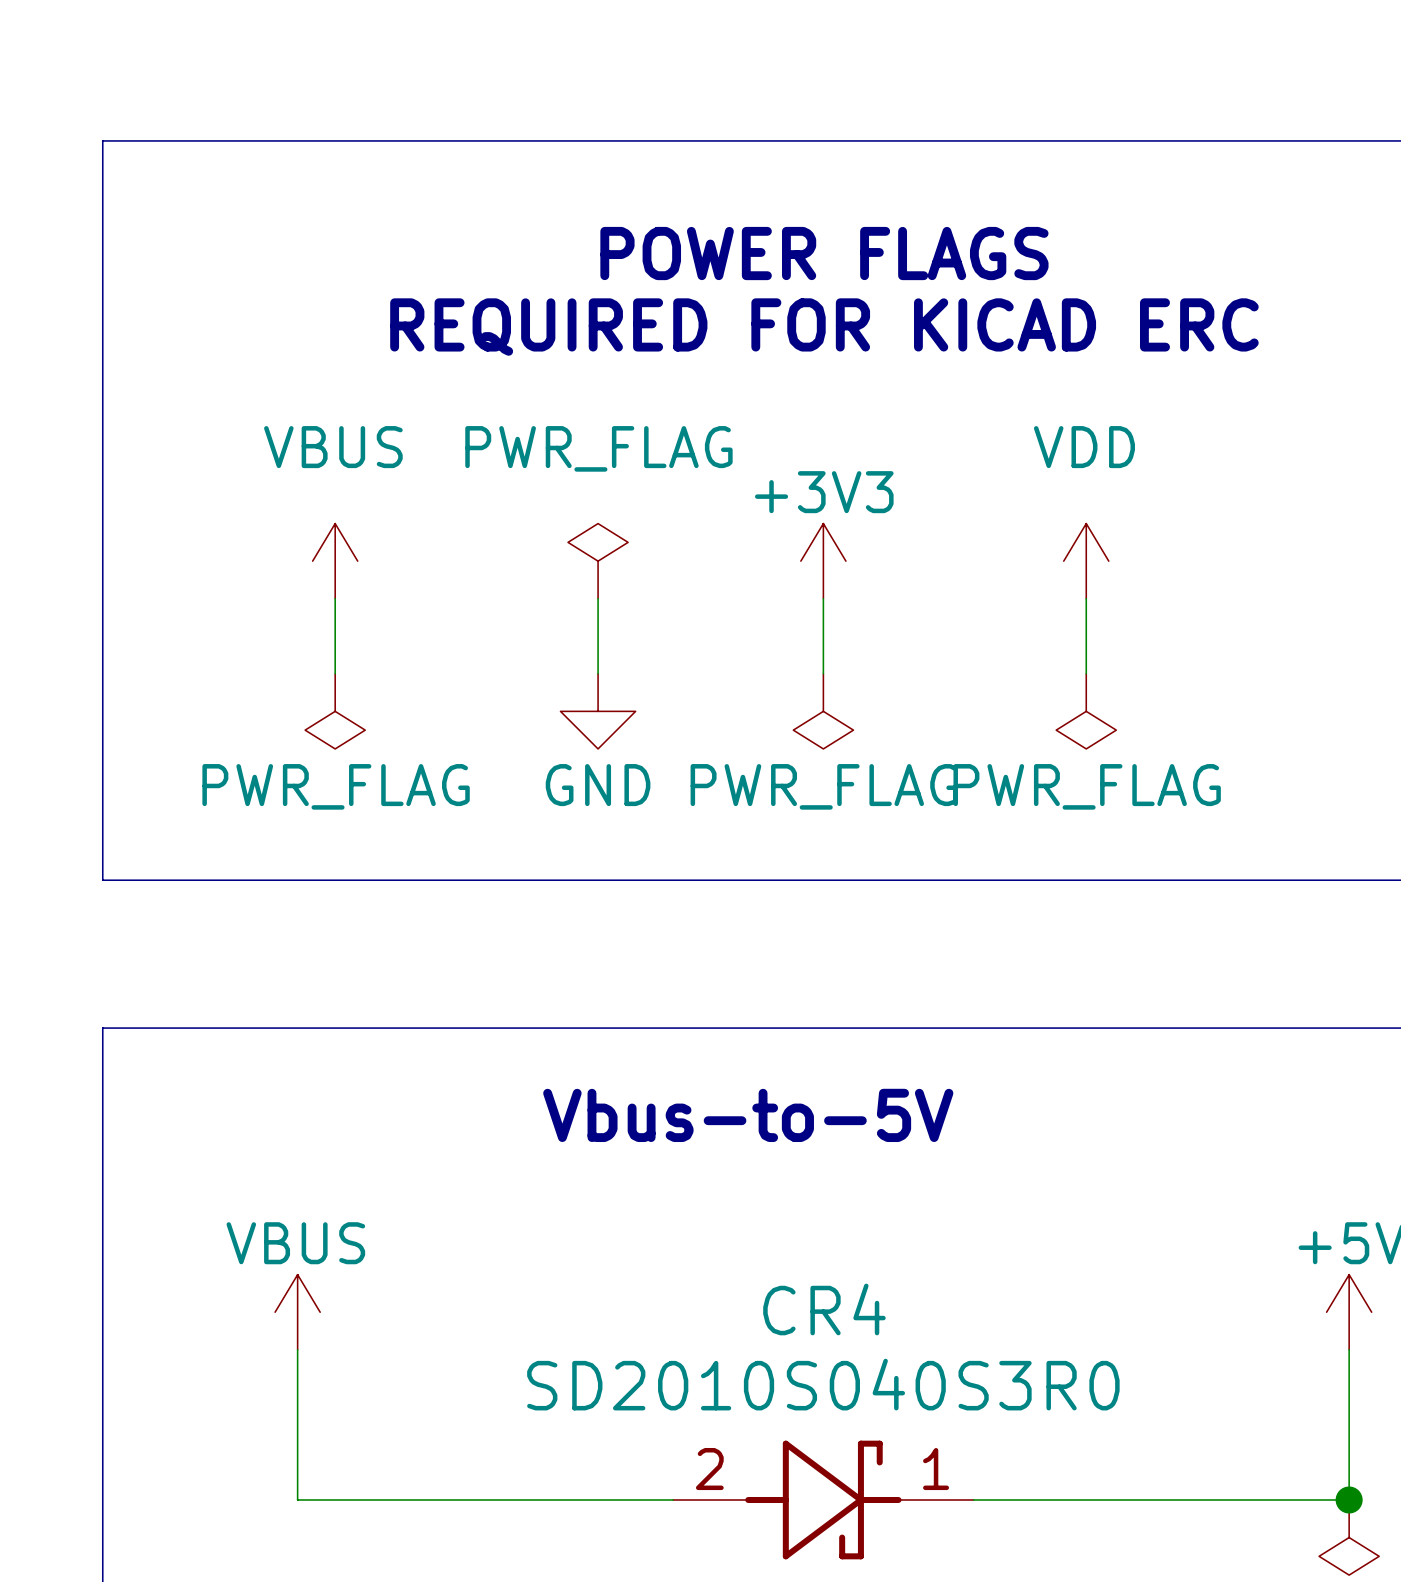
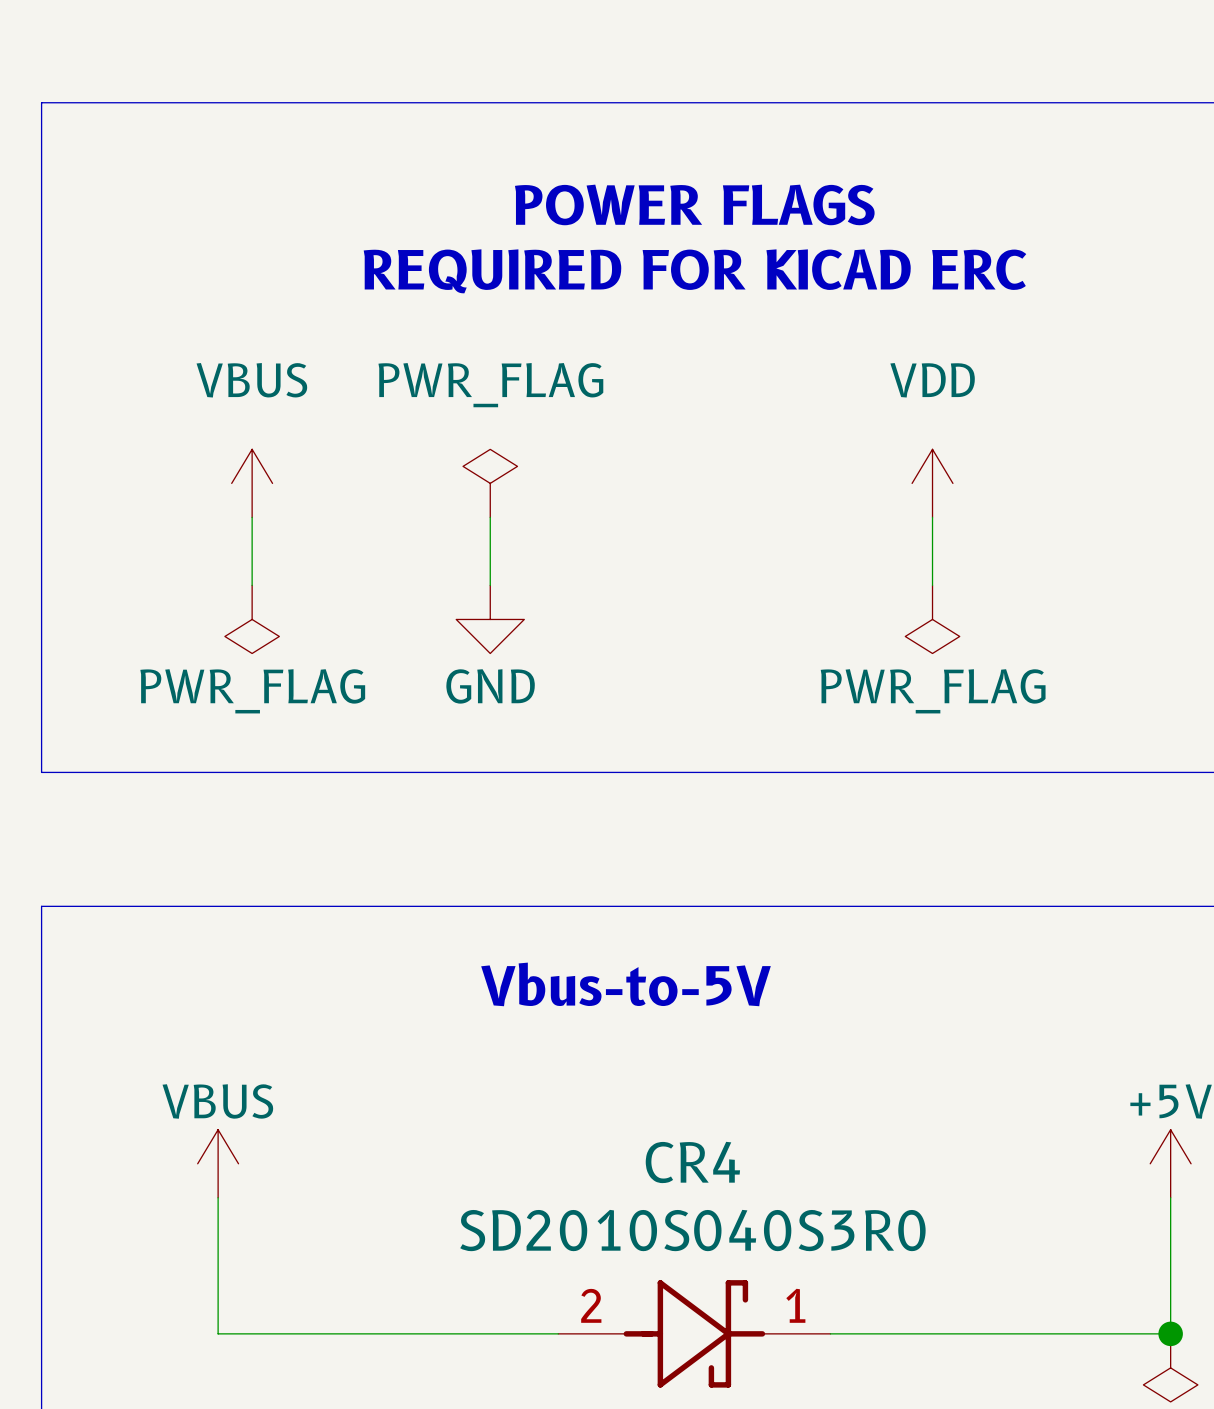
power symbol: +3V3 (823, 561) -> none
wire: (823, 598) (823, 673) -> none
power symbol: PWR_FLAG (823, 711) -> none

